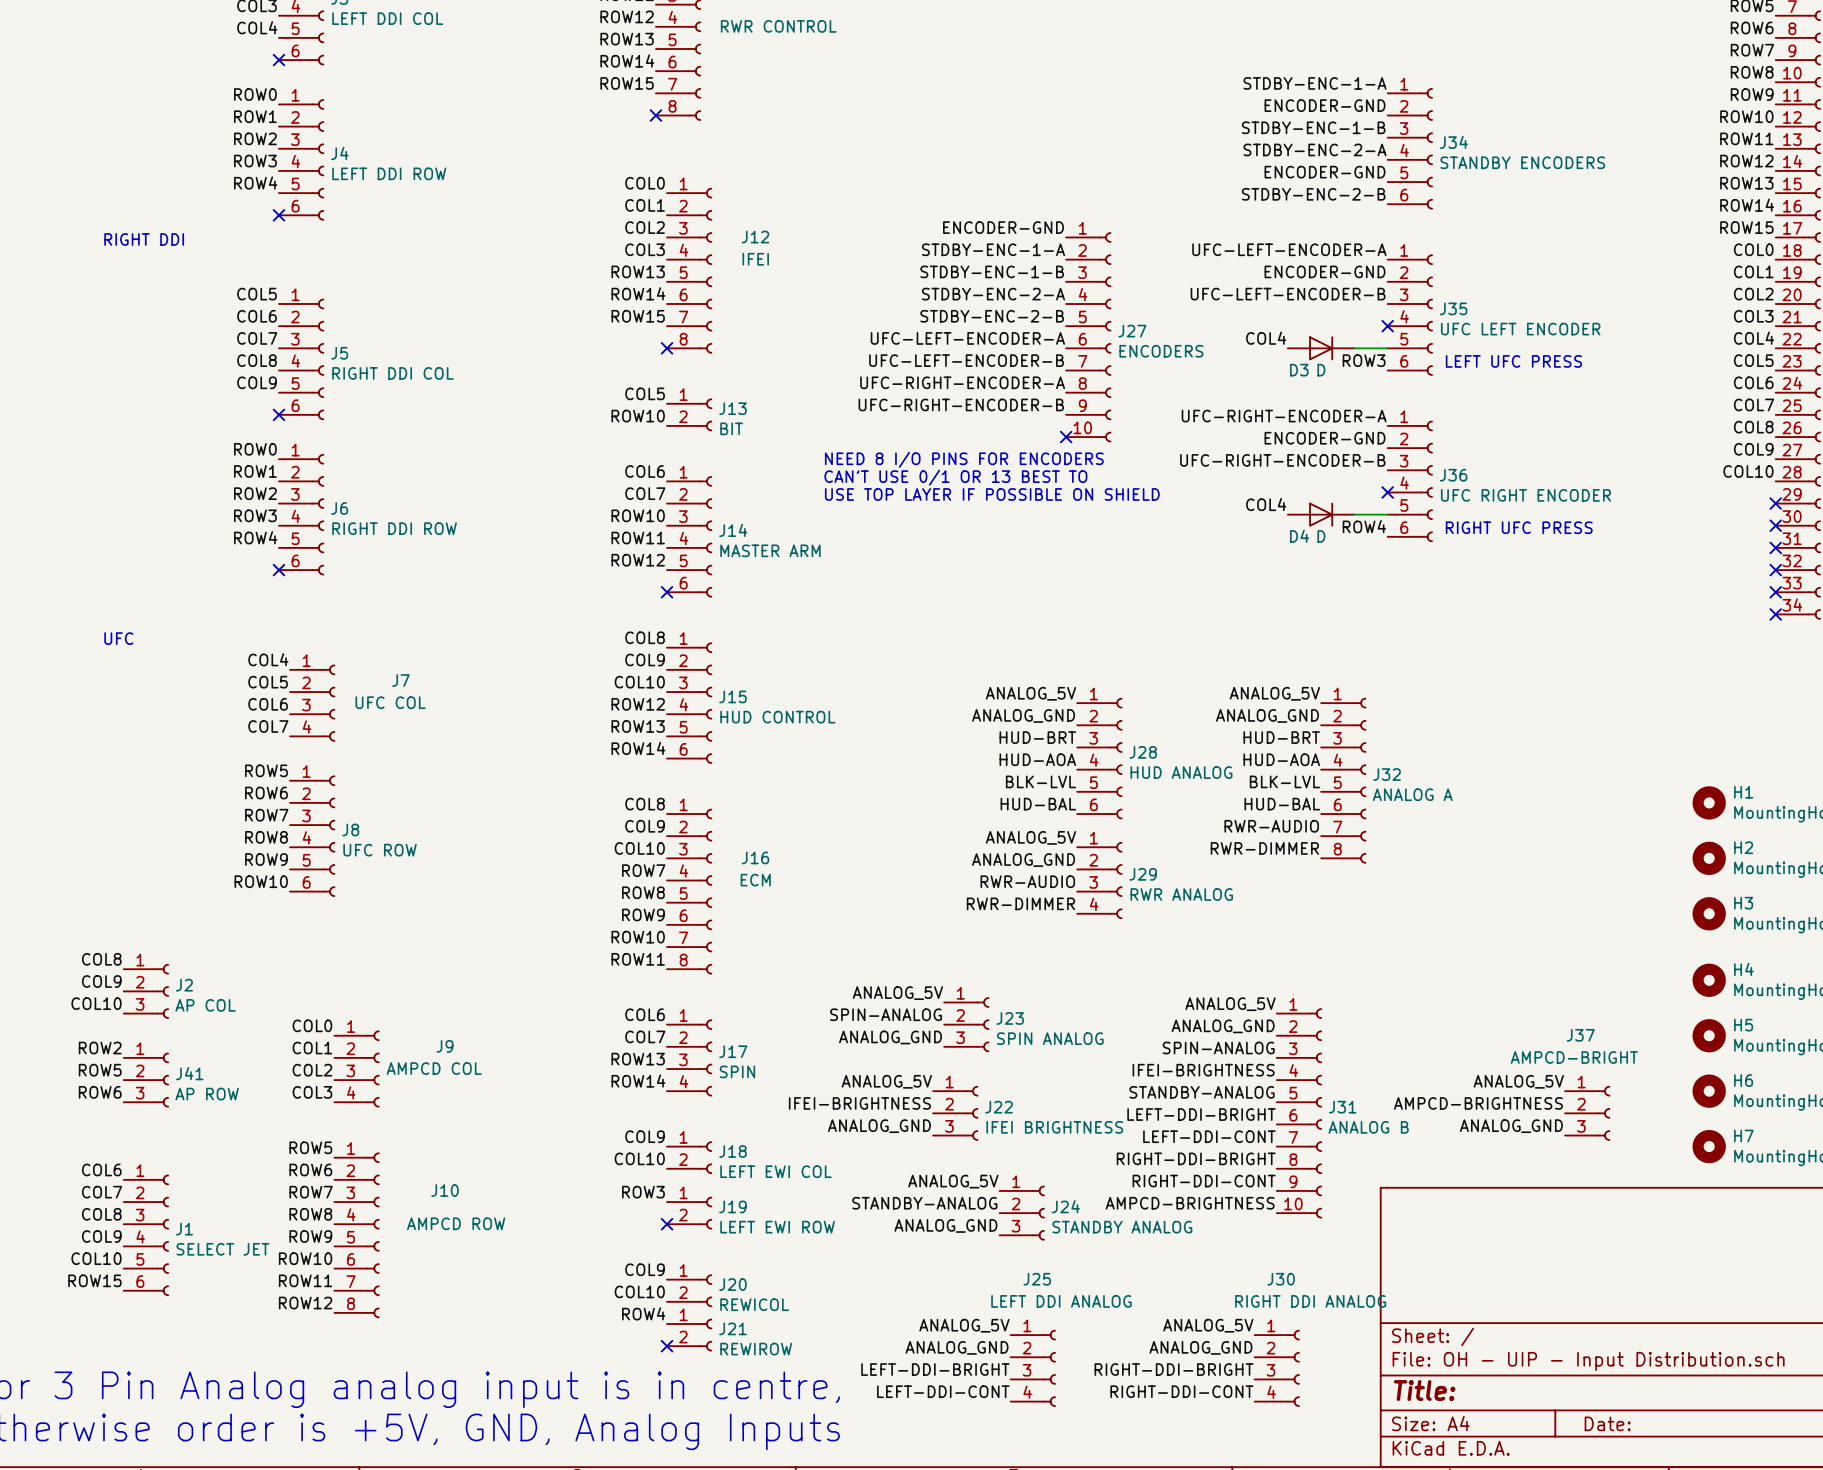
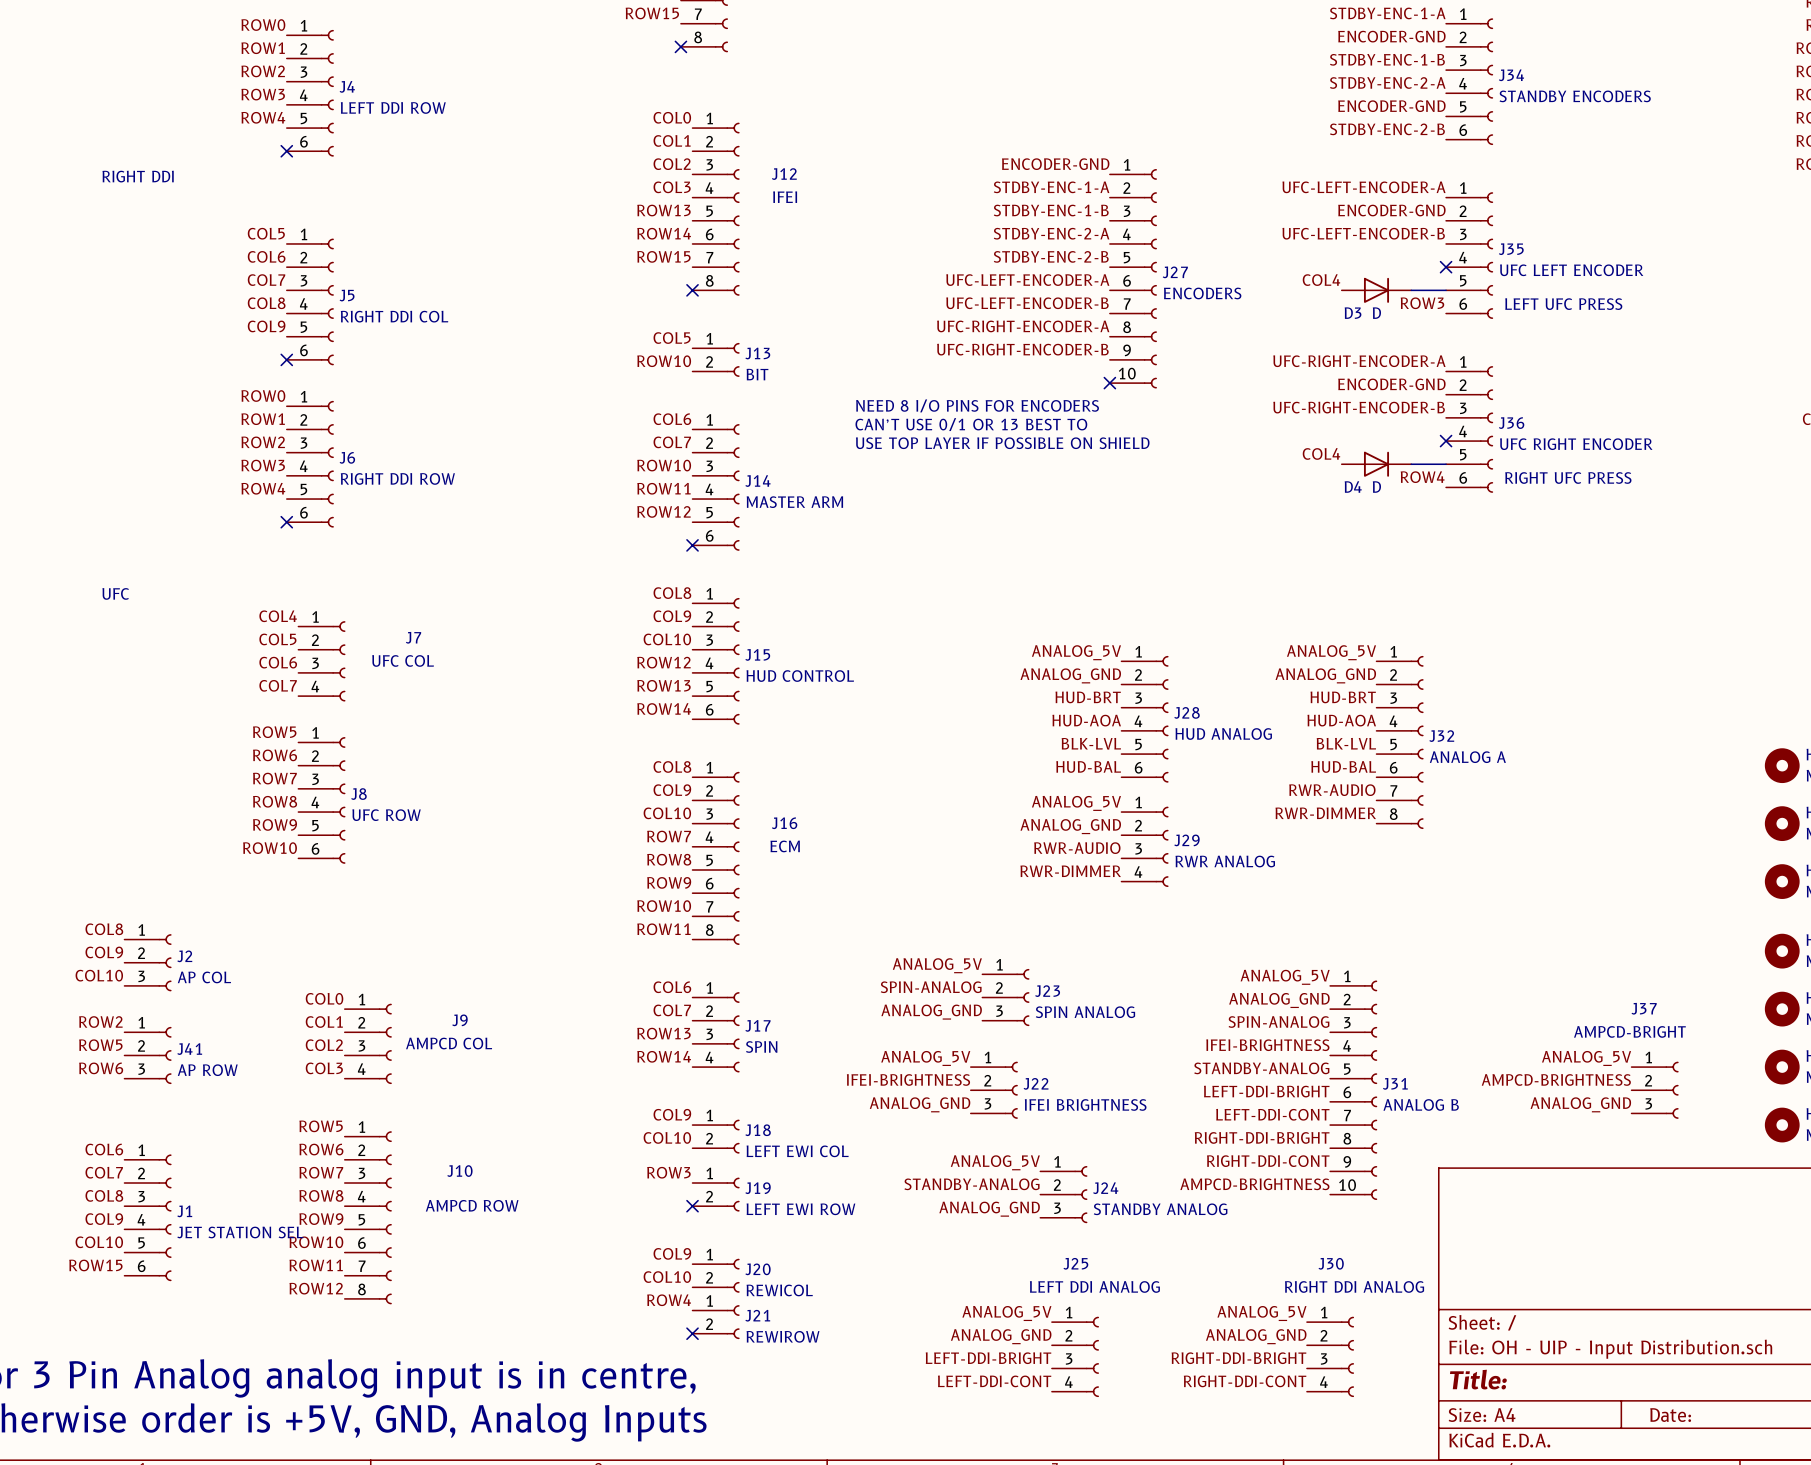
J1 value: SELECT JET (222, 1249) -> JET STATION SEL (240, 1232)

